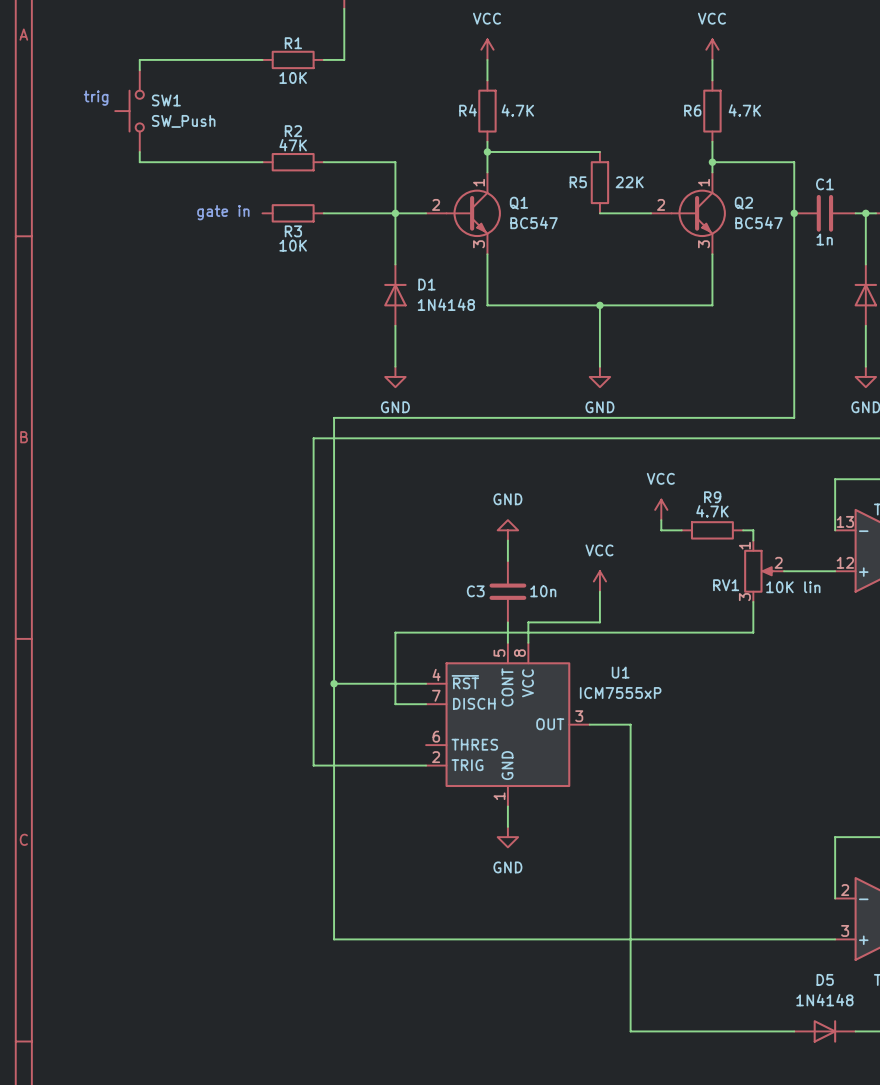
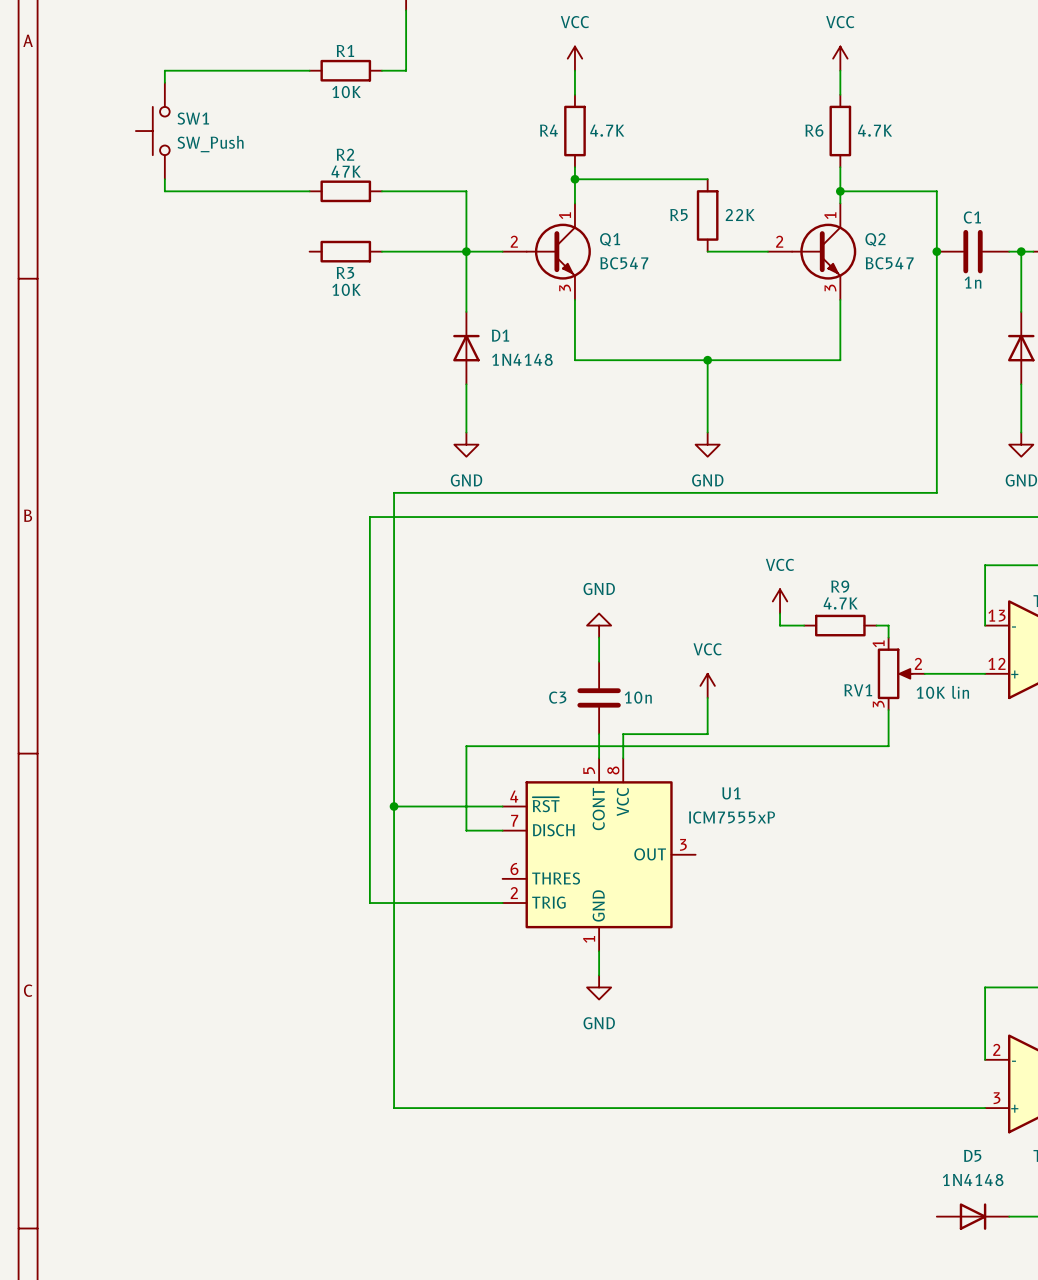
text: trig (96, 98) -> none
text: gate in (223, 212) -> none
wire: (589, 724) (630, 724) (630, 1031) (794, 1031) -> none

